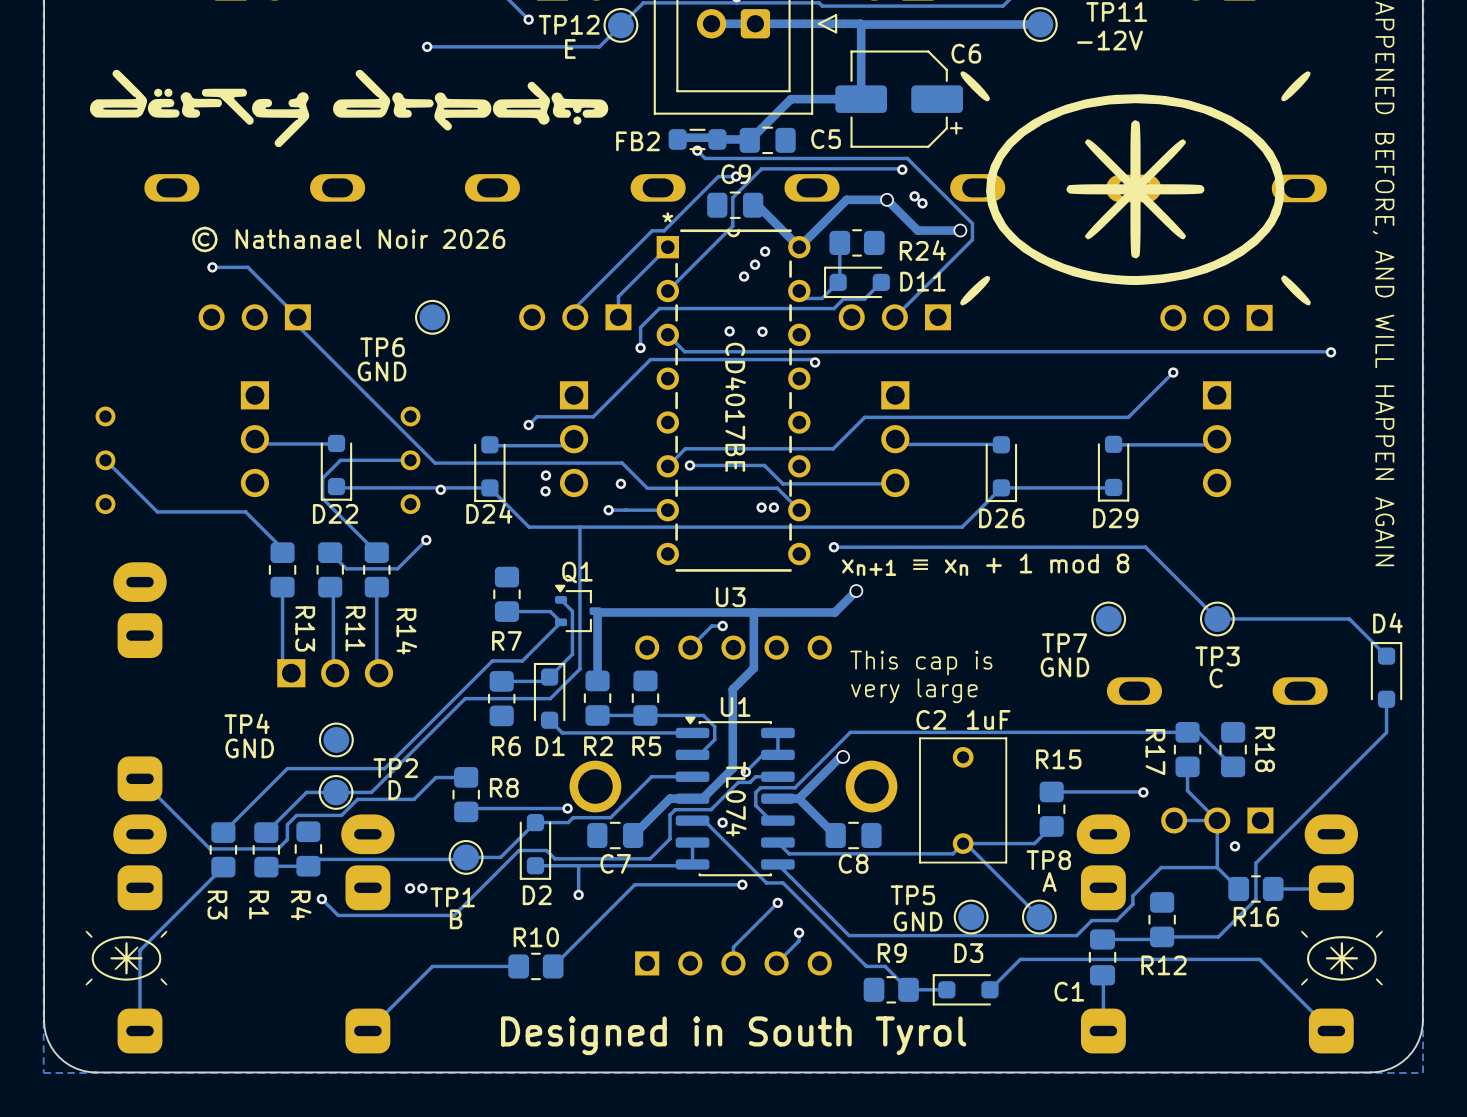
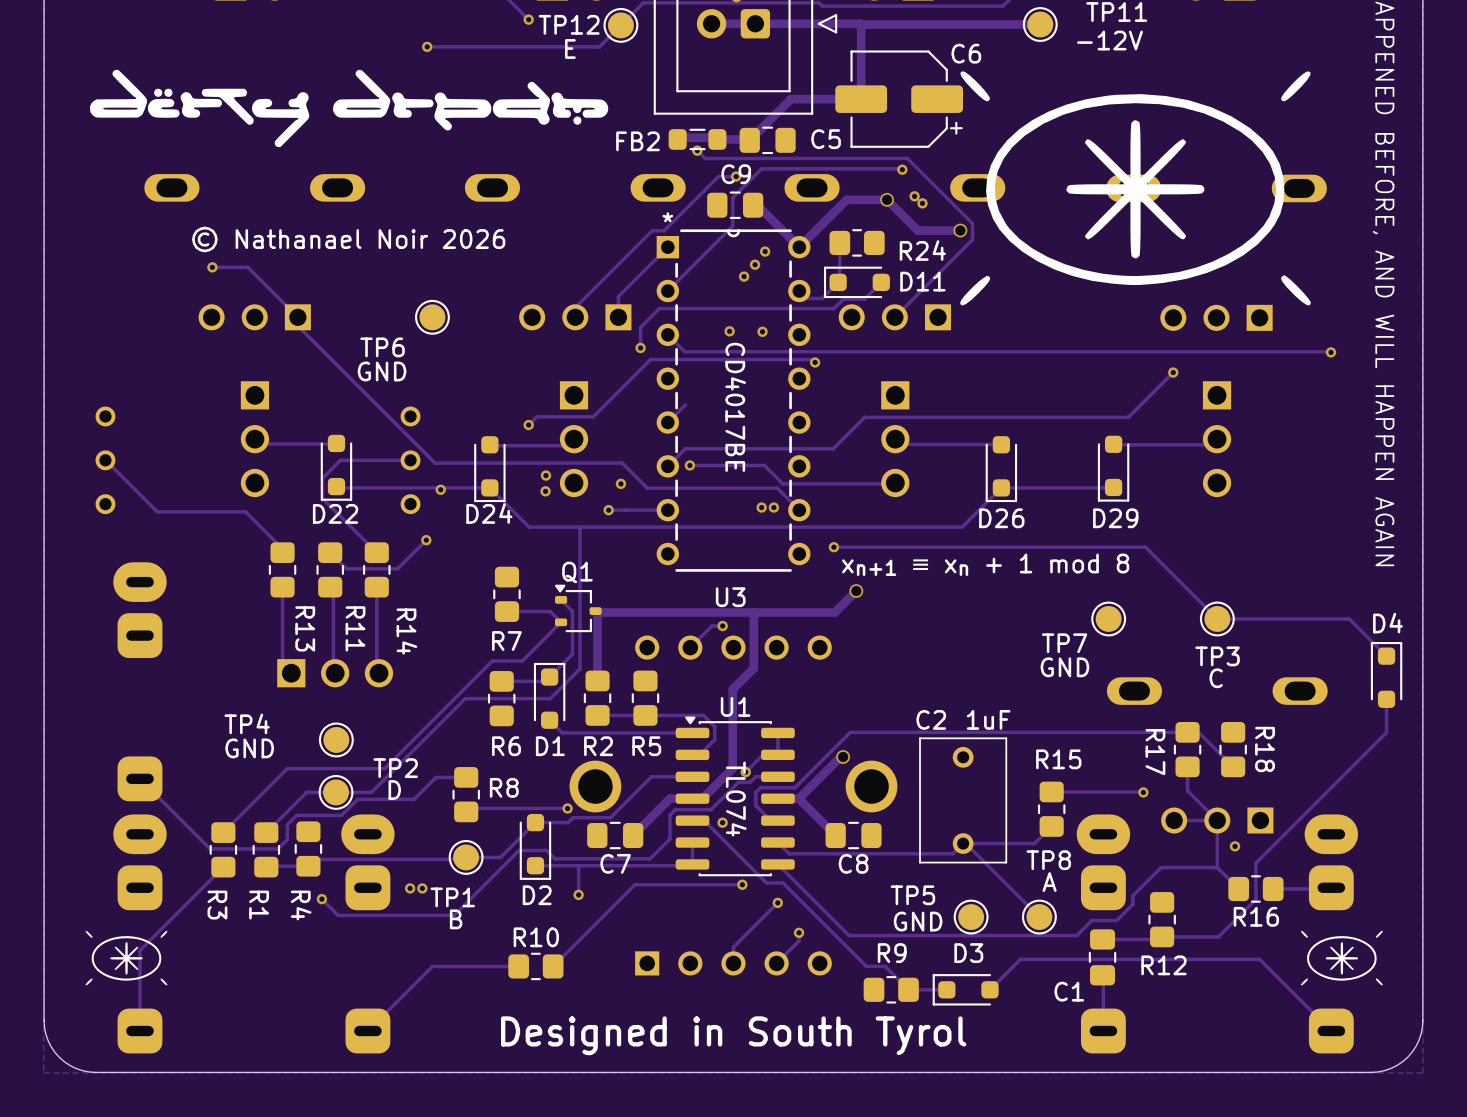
track: none -> (685, 404) (667, 422)
text: This cap is (921, 662) -> none
text: very large (914, 690) -> none

